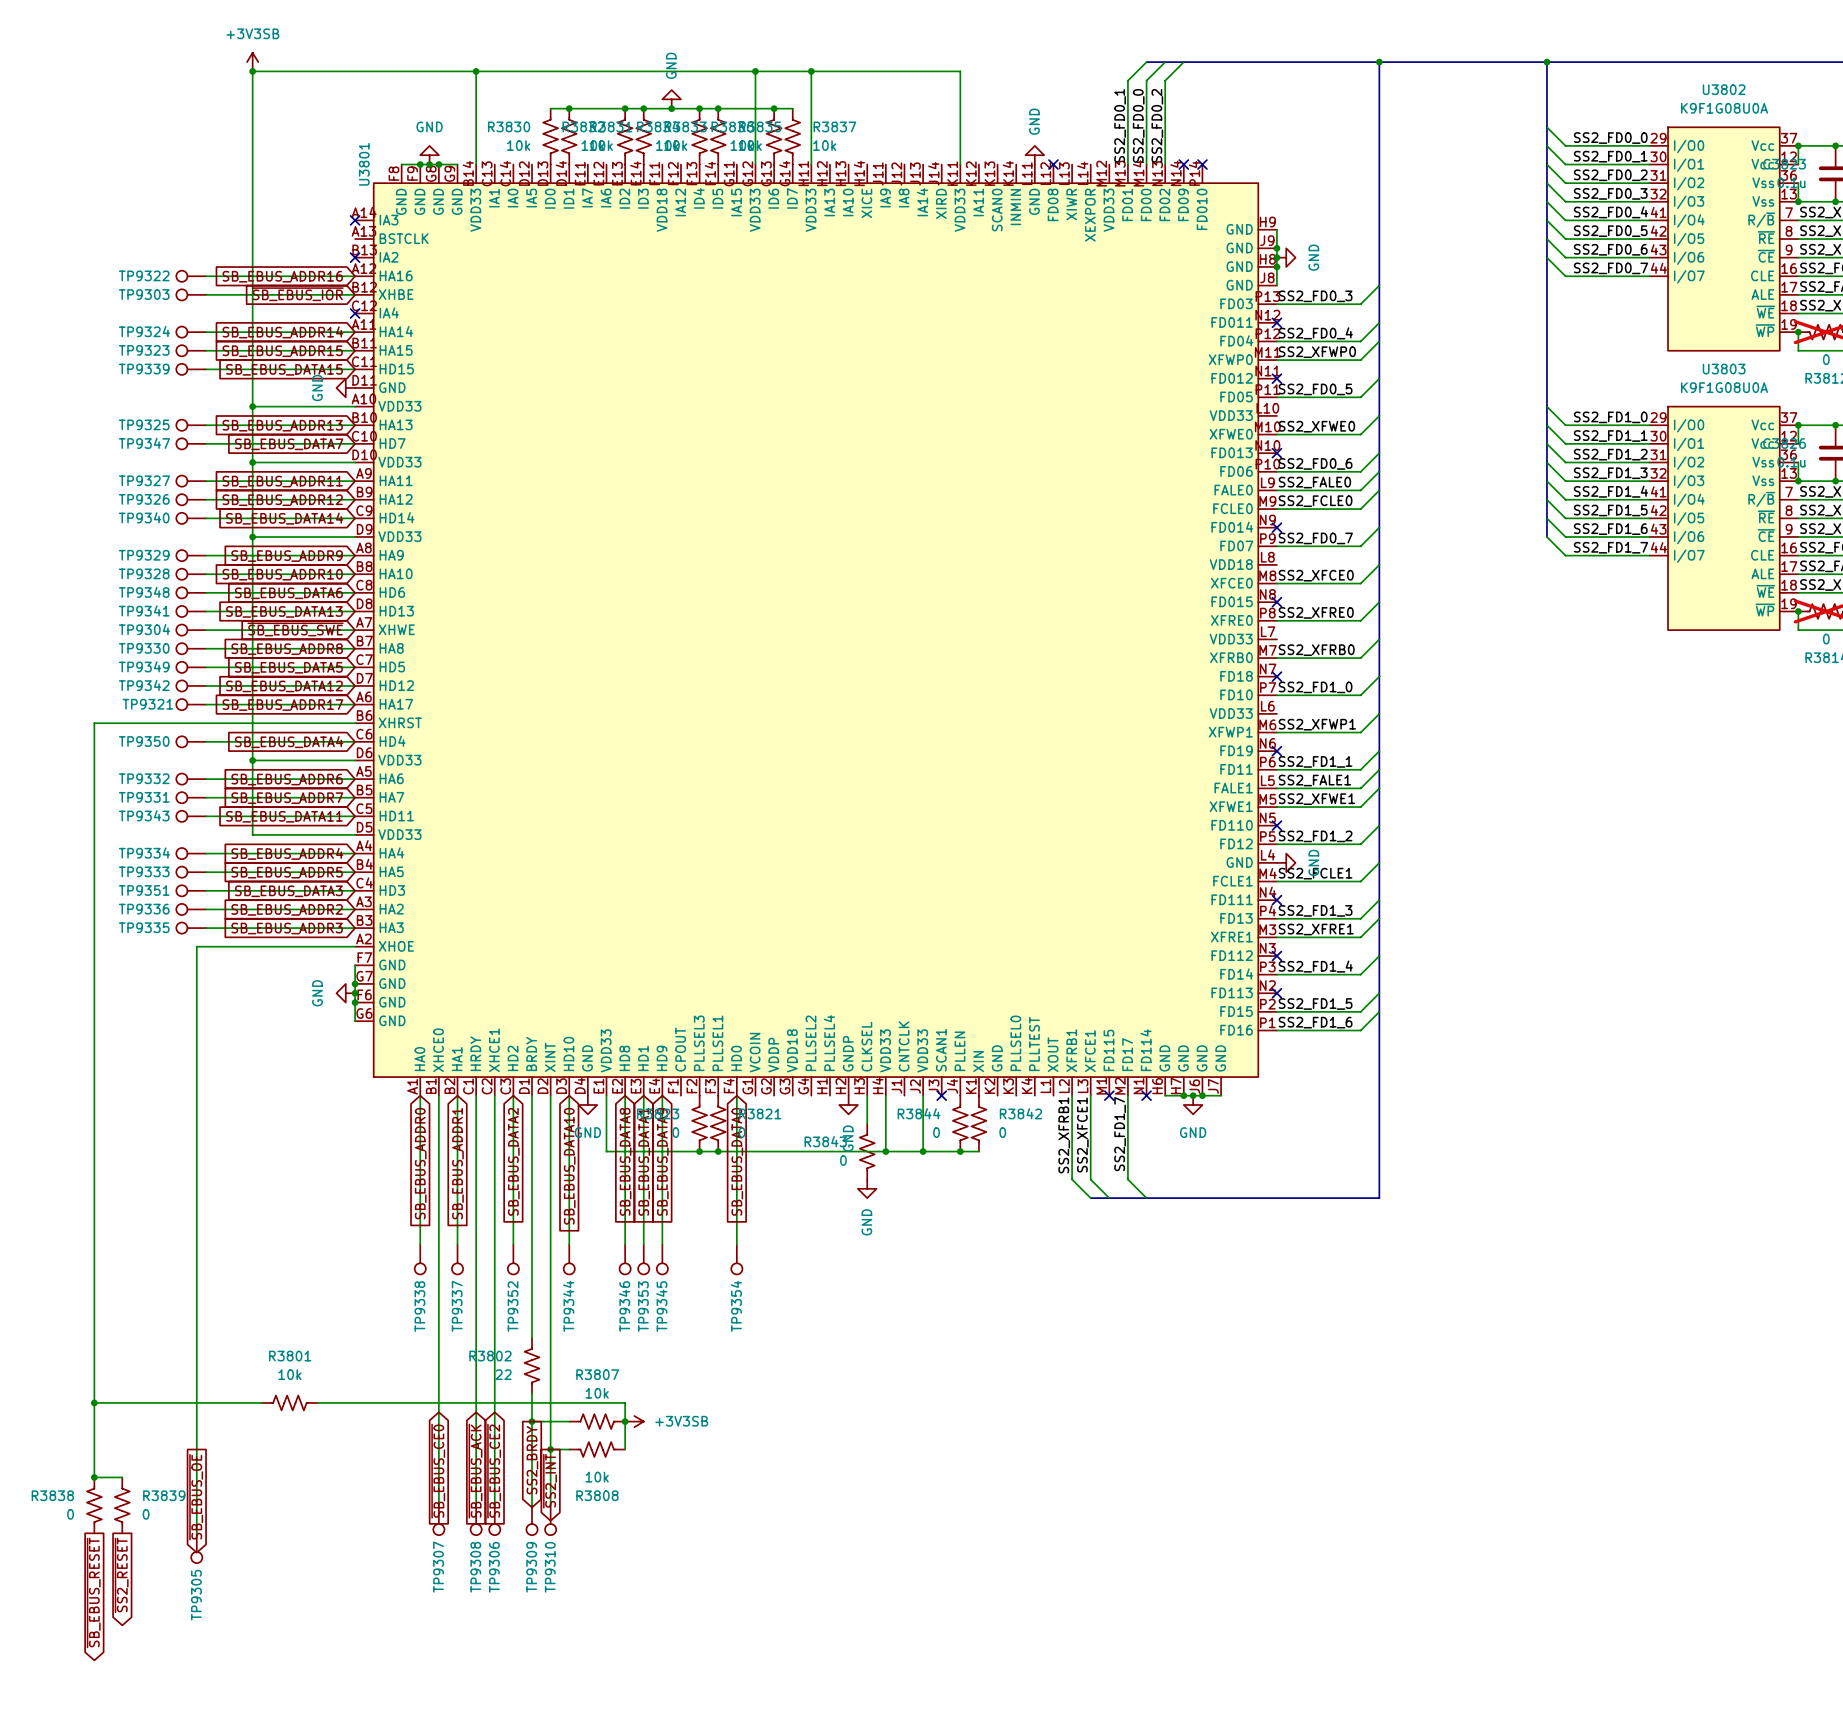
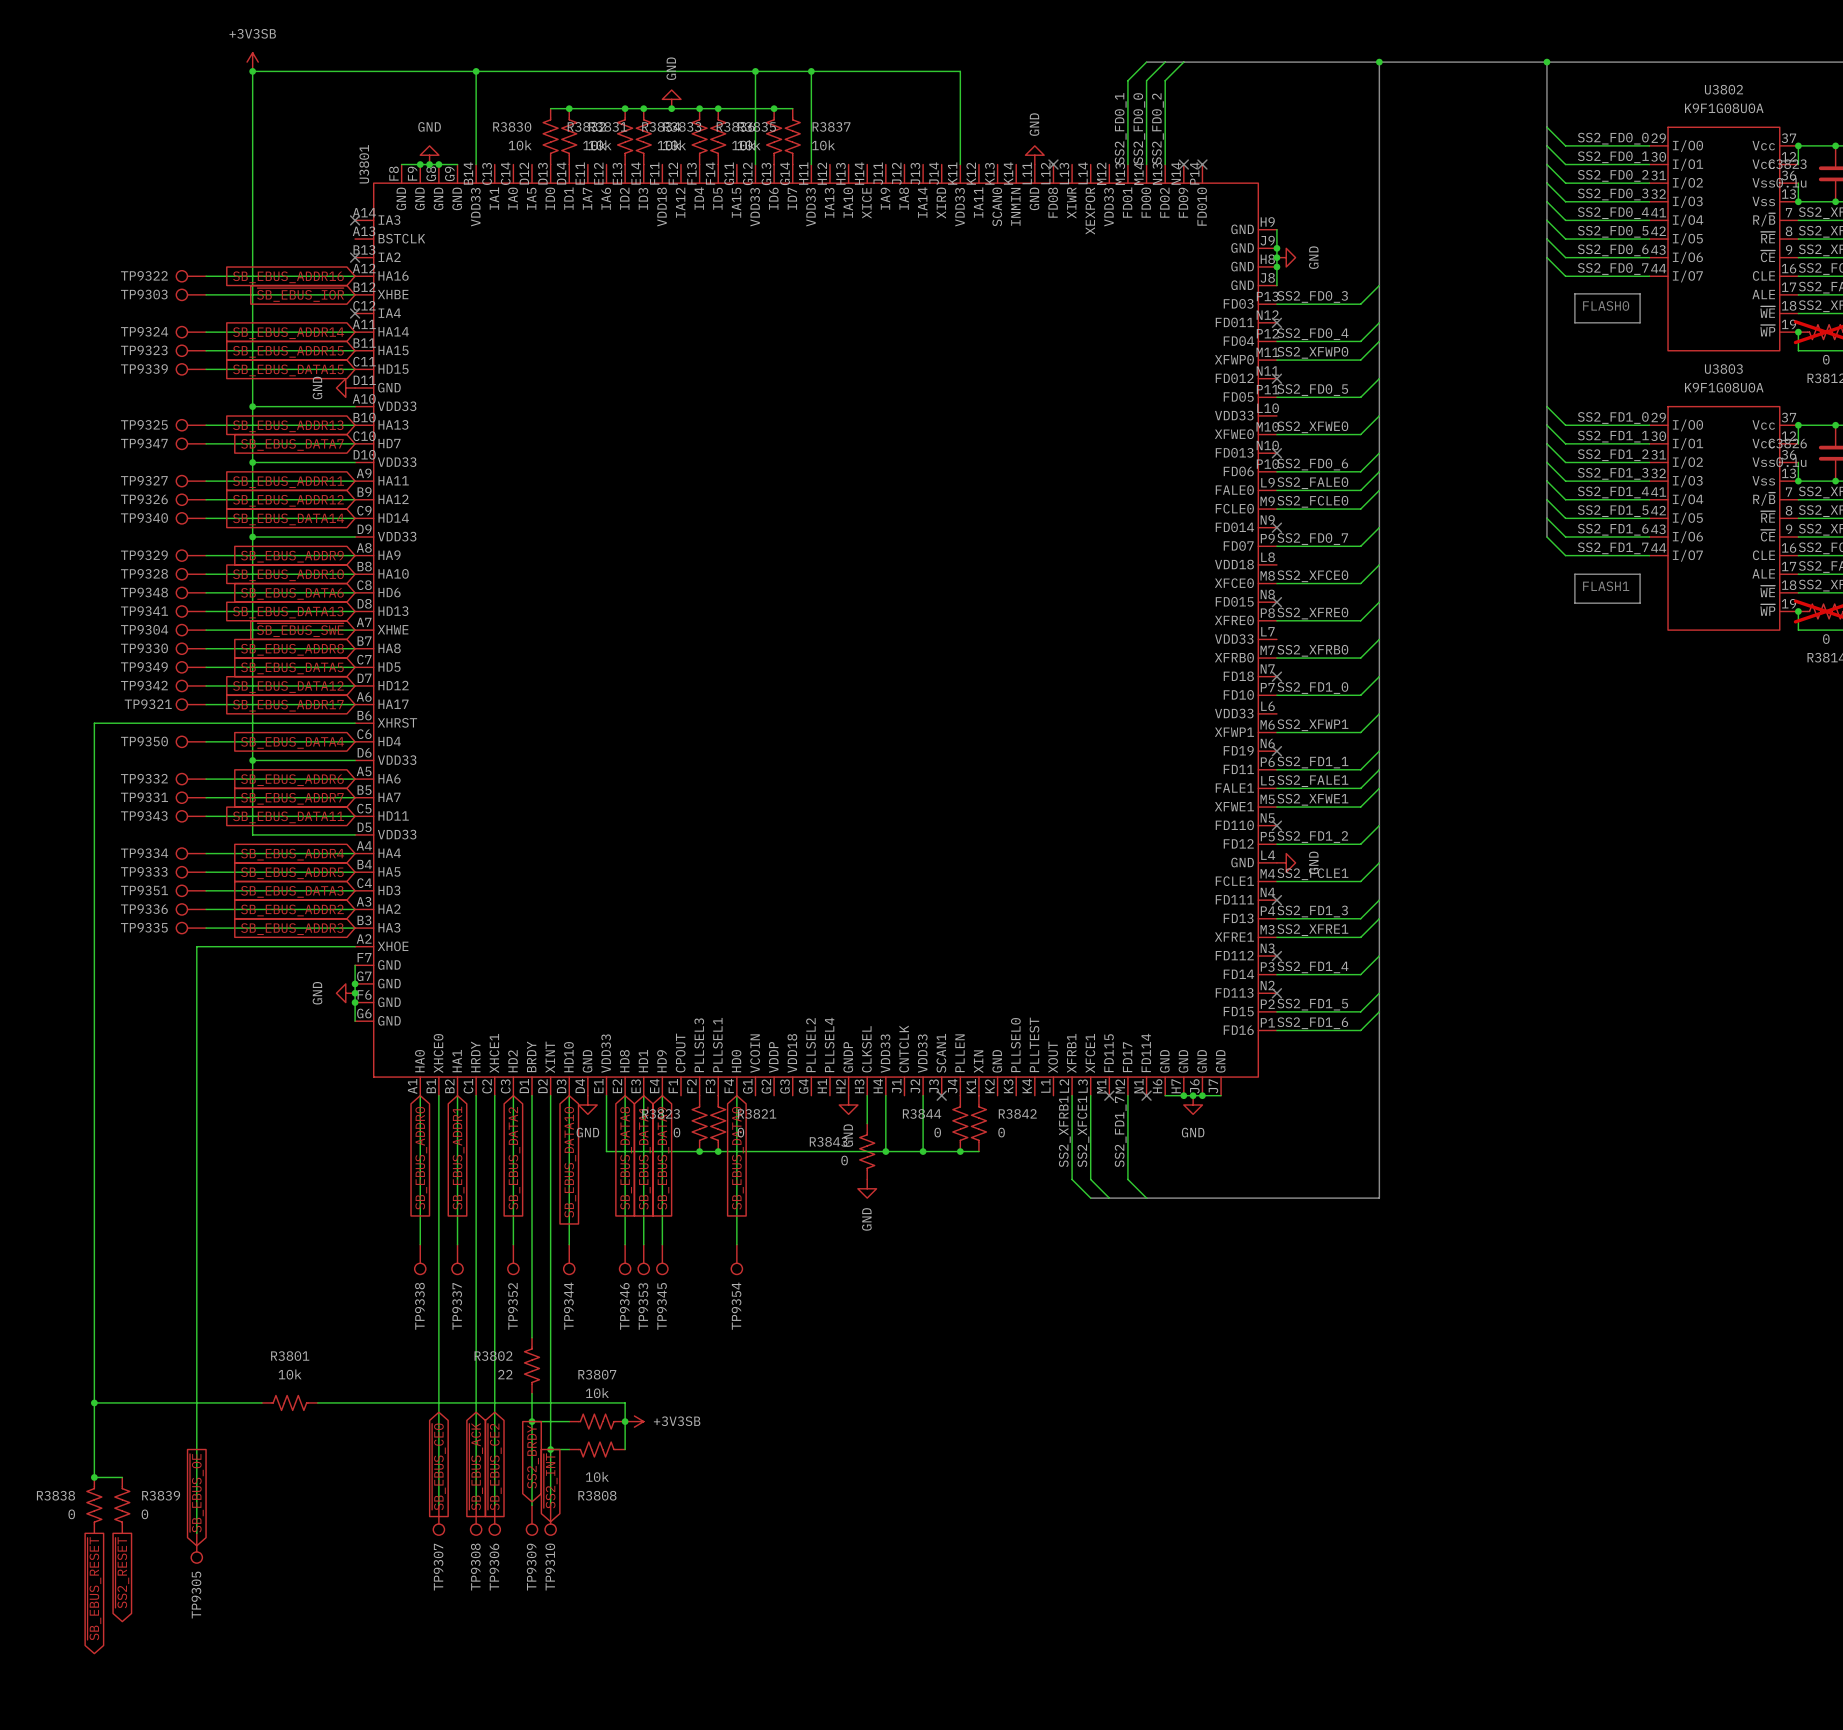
line: none -> (1574, 293) (1640, 293) (1640, 322) (1574, 322) (1574, 293)
text: none -> FLASH0 (1606, 305)
line: none -> (1574, 574) (1574, 603) (1640, 603) (1640, 574) (1574, 574)
text: none -> FLASH1 (1606, 586)

